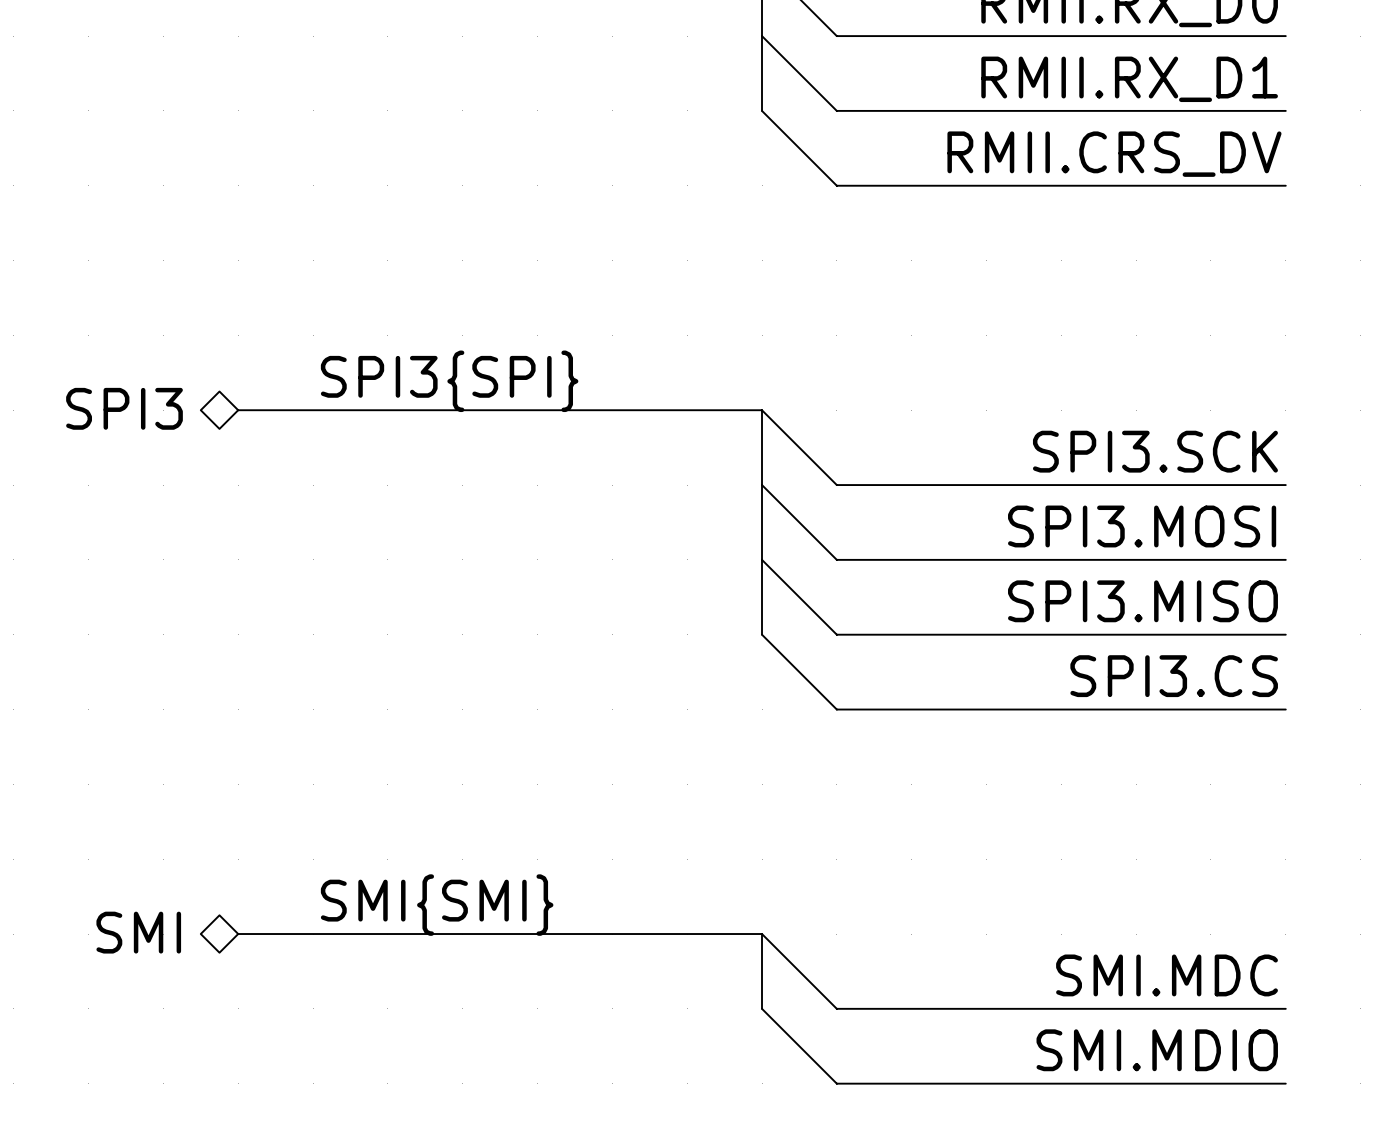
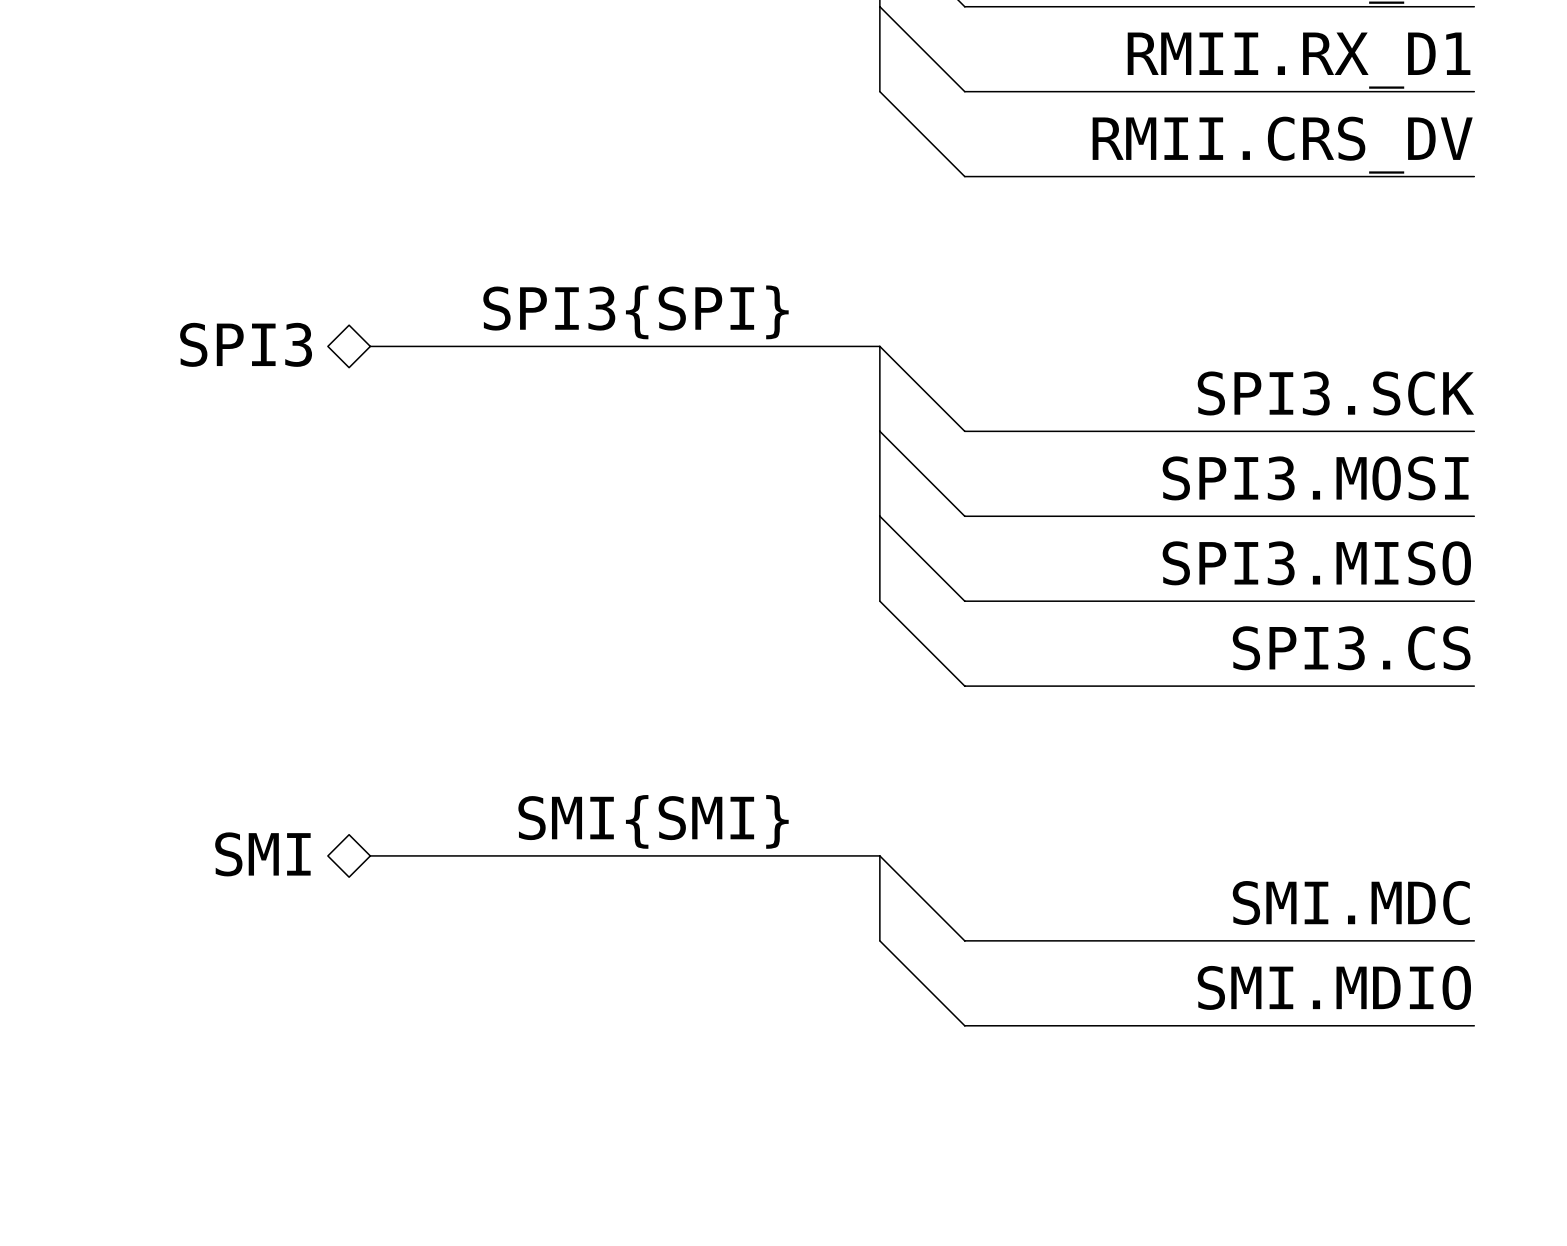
label: none -> SPI3.SCK (1335, 393)
label position: SPI3{SPI} (449, 381) -> SPI3{SPI} (636, 312)
hierarchical label position: SPI3 (124, 408) -> SPI3 (246, 344)
bus: (238, 410) (762, 410) -> (370, 346) (879, 346) (879, 431)
label: SPI3.SCK (1155, 451) -> SPI3.MOSI (1315, 478)
label: SPI3.MOSI (1142, 526) -> SPI3.MISO (1316, 563)
bus: (762, 559) (762, 634) -> none
label: SPI3.MISO (1142, 601) -> SPI3.CS (1351, 648)
wire: (762, 634) (836, 709) (1285, 709) -> (879, 346) (964, 431) (1474, 431)
label: SPI3.CS (1174, 676) -> none
bus: none -> (370, 855) (879, 855) (879, 940)
label position: SMI{SMI} (437, 905) -> SMI{SMI} (653, 821)
hierarchical label position: SMI (138, 932) -> SMI (262, 854)
bus: (238, 934) (762, 934) (762, 1008) -> none
wire: (762, 934) (836, 1008) (1285, 1008) -> (879, 855) (964, 940) (1474, 940)
label position: SMI.MDC (1167, 975) -> SMI.MDC (1351, 903)
wire: (762, 1008) (836, 1083) (1285, 1083) -> (879, 940) (964, 1025) (1474, 1025)
label position: SMI.MDIO (1157, 1050) -> SMI.MDIO (1334, 987)

